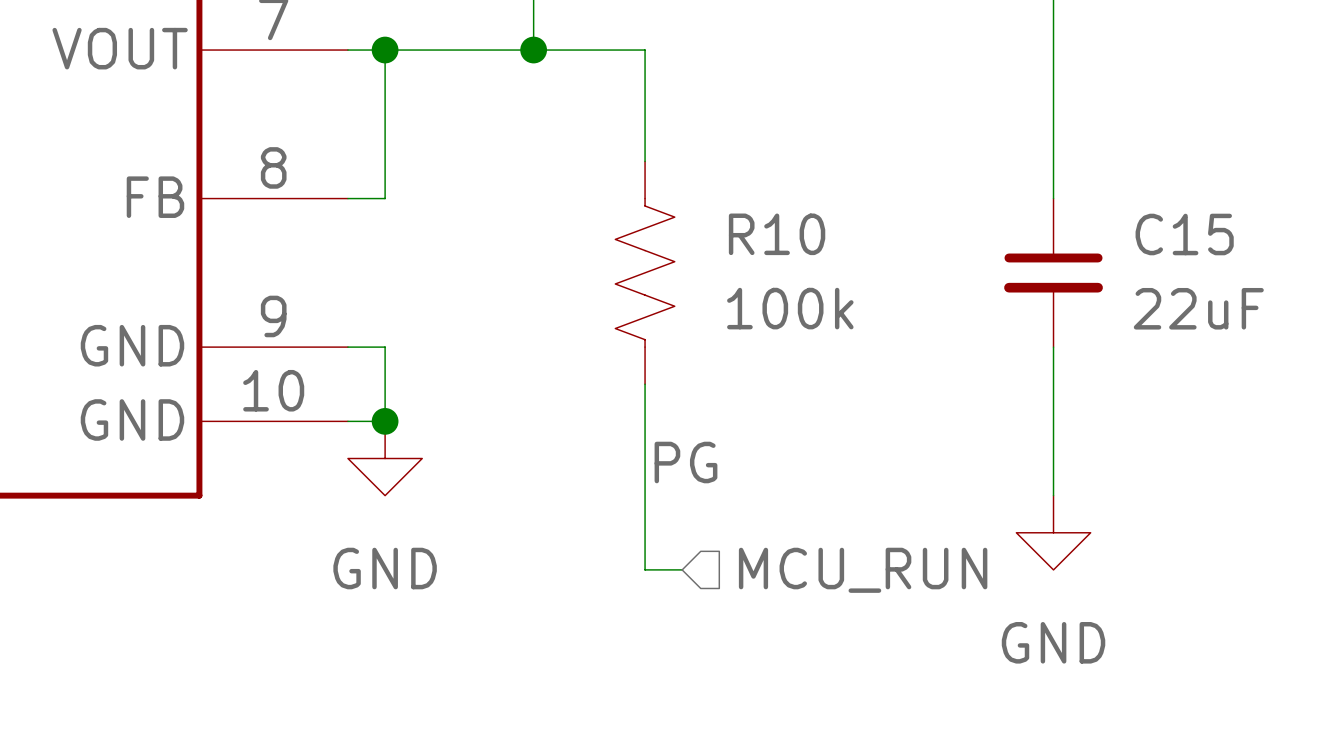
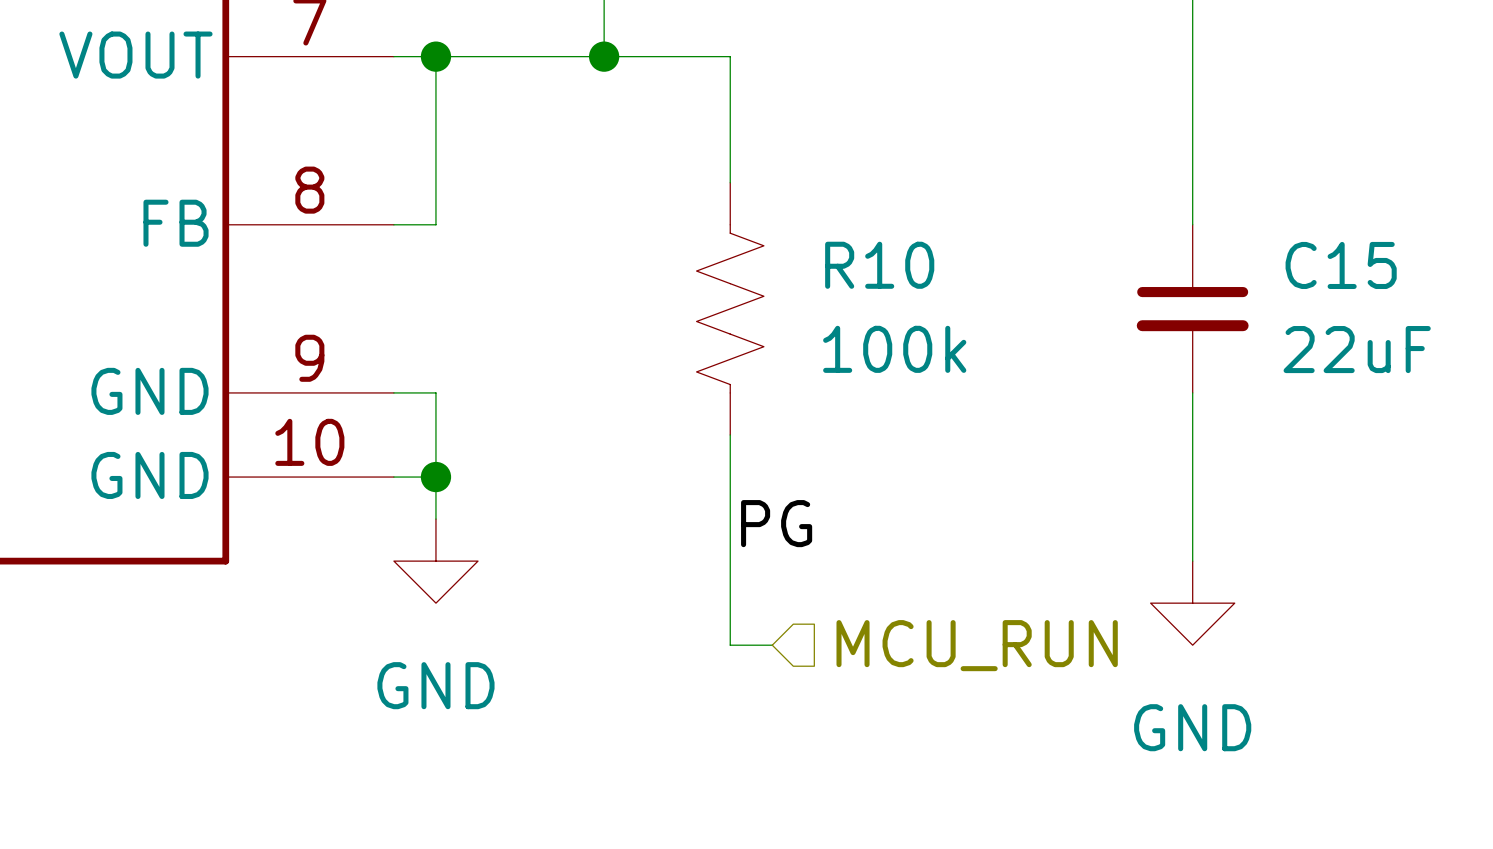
power symbol position: GND (385, 458) -> GND (435, 561)

